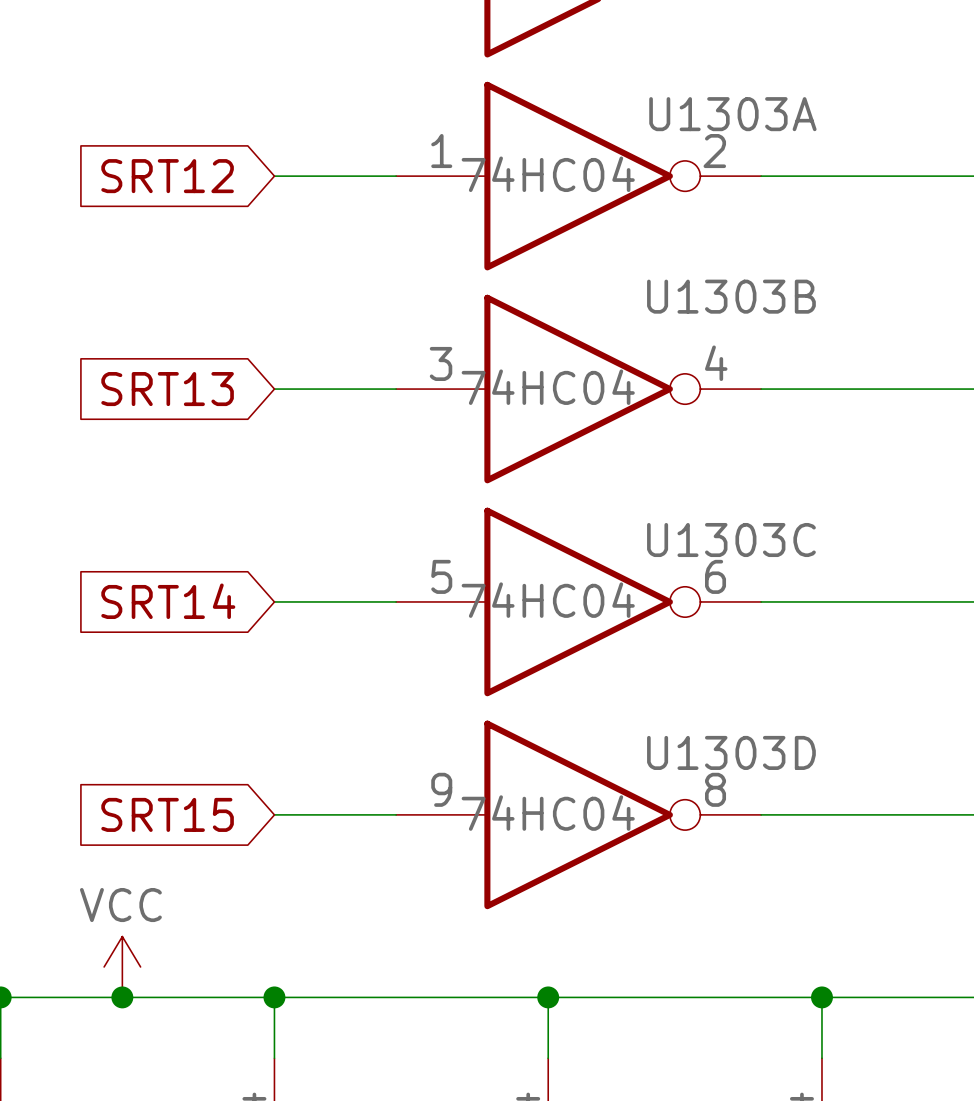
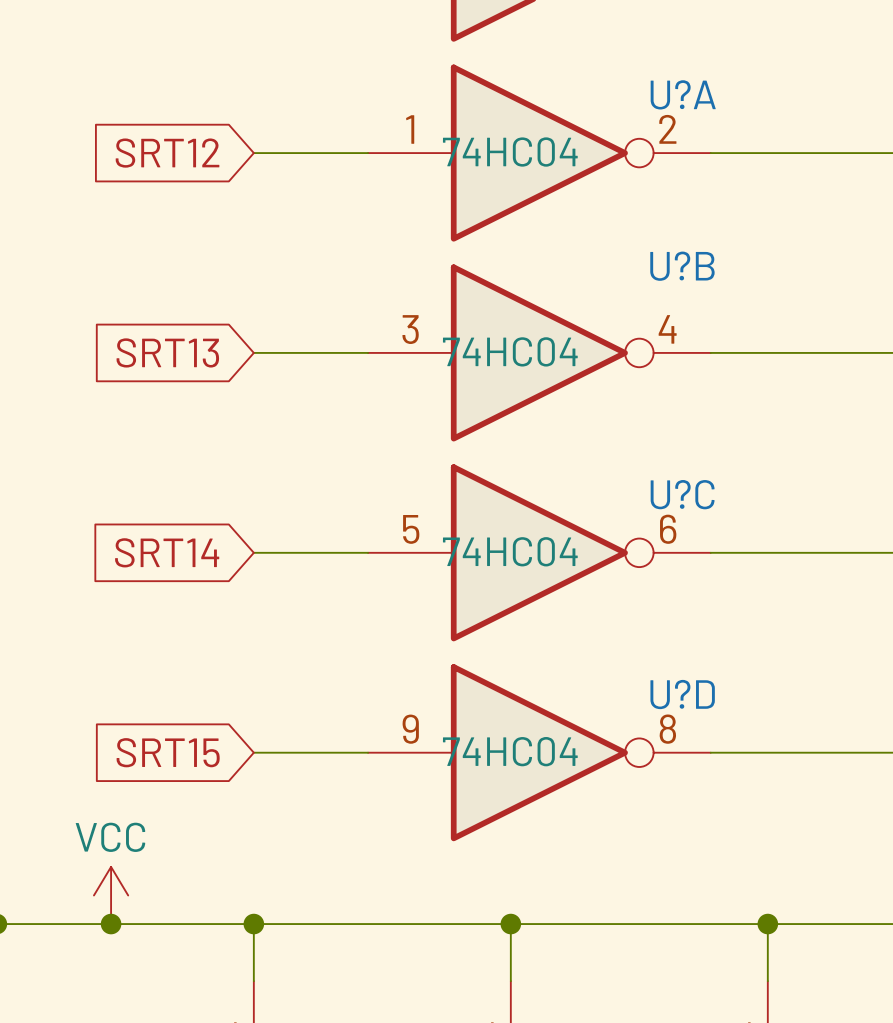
U1303A name: U1303A (732, 114) -> U?A (683, 94)
U1303B name: U1303B (731, 296) -> U?B (682, 266)
U1303C name: U1303C (731, 540) -> U?C (682, 494)
U1303D name: U1303D (731, 752) -> U?D (682, 694)

